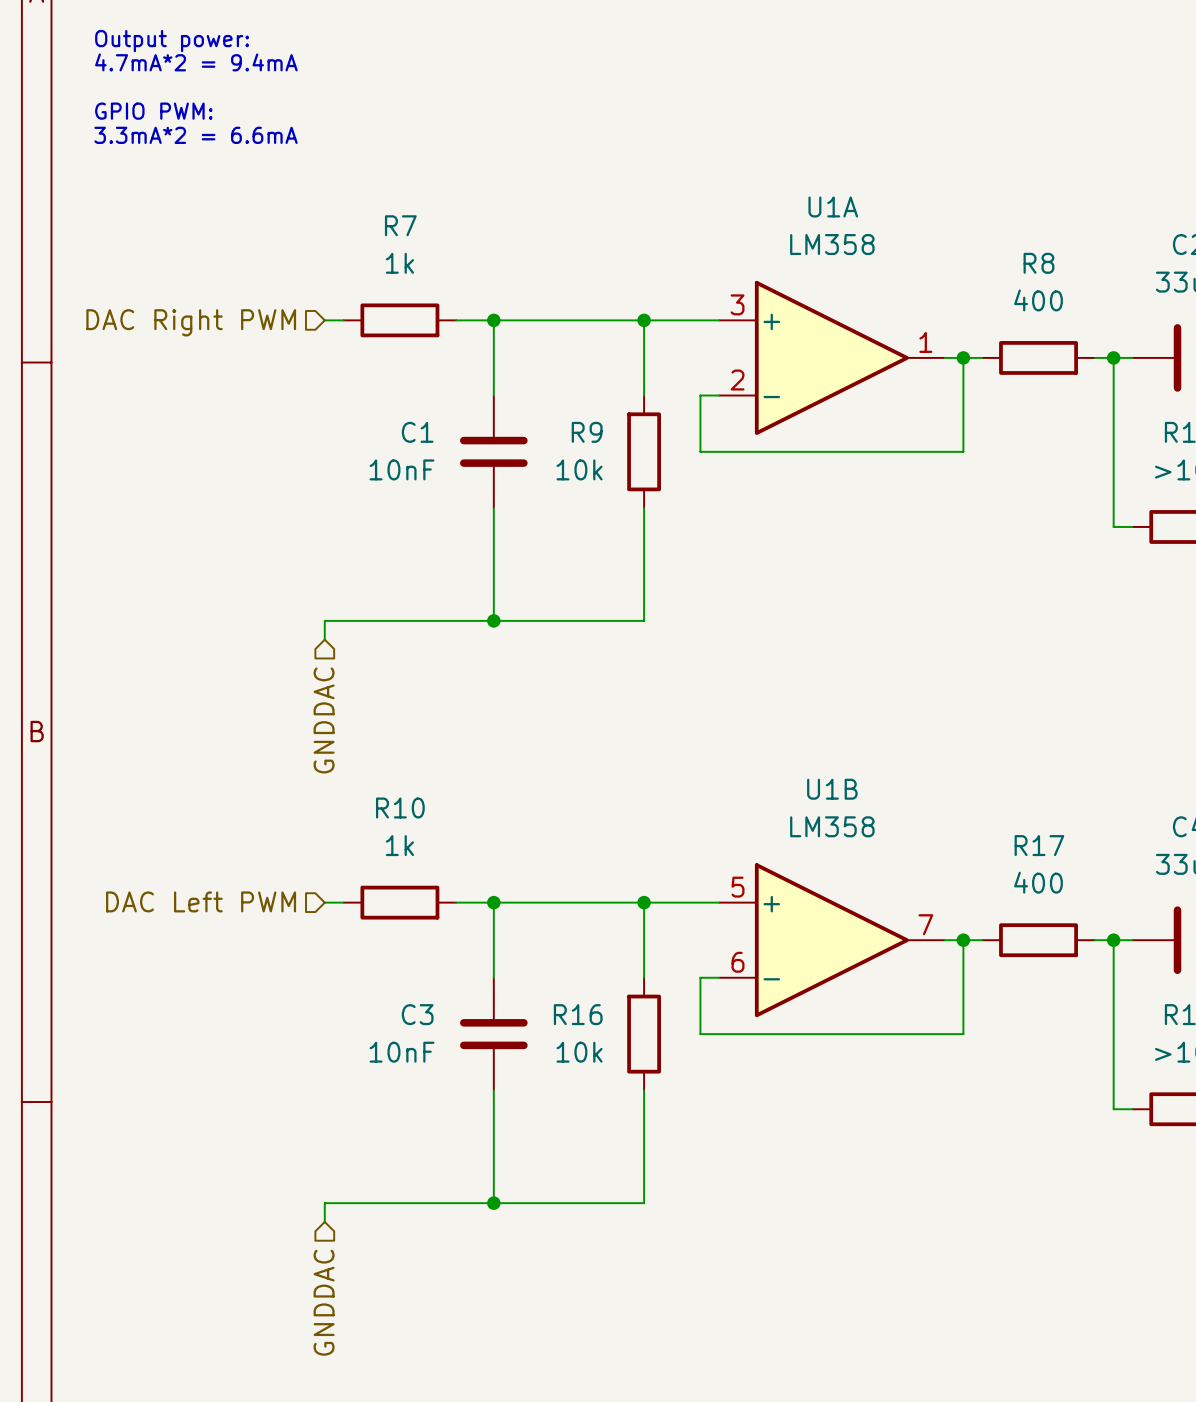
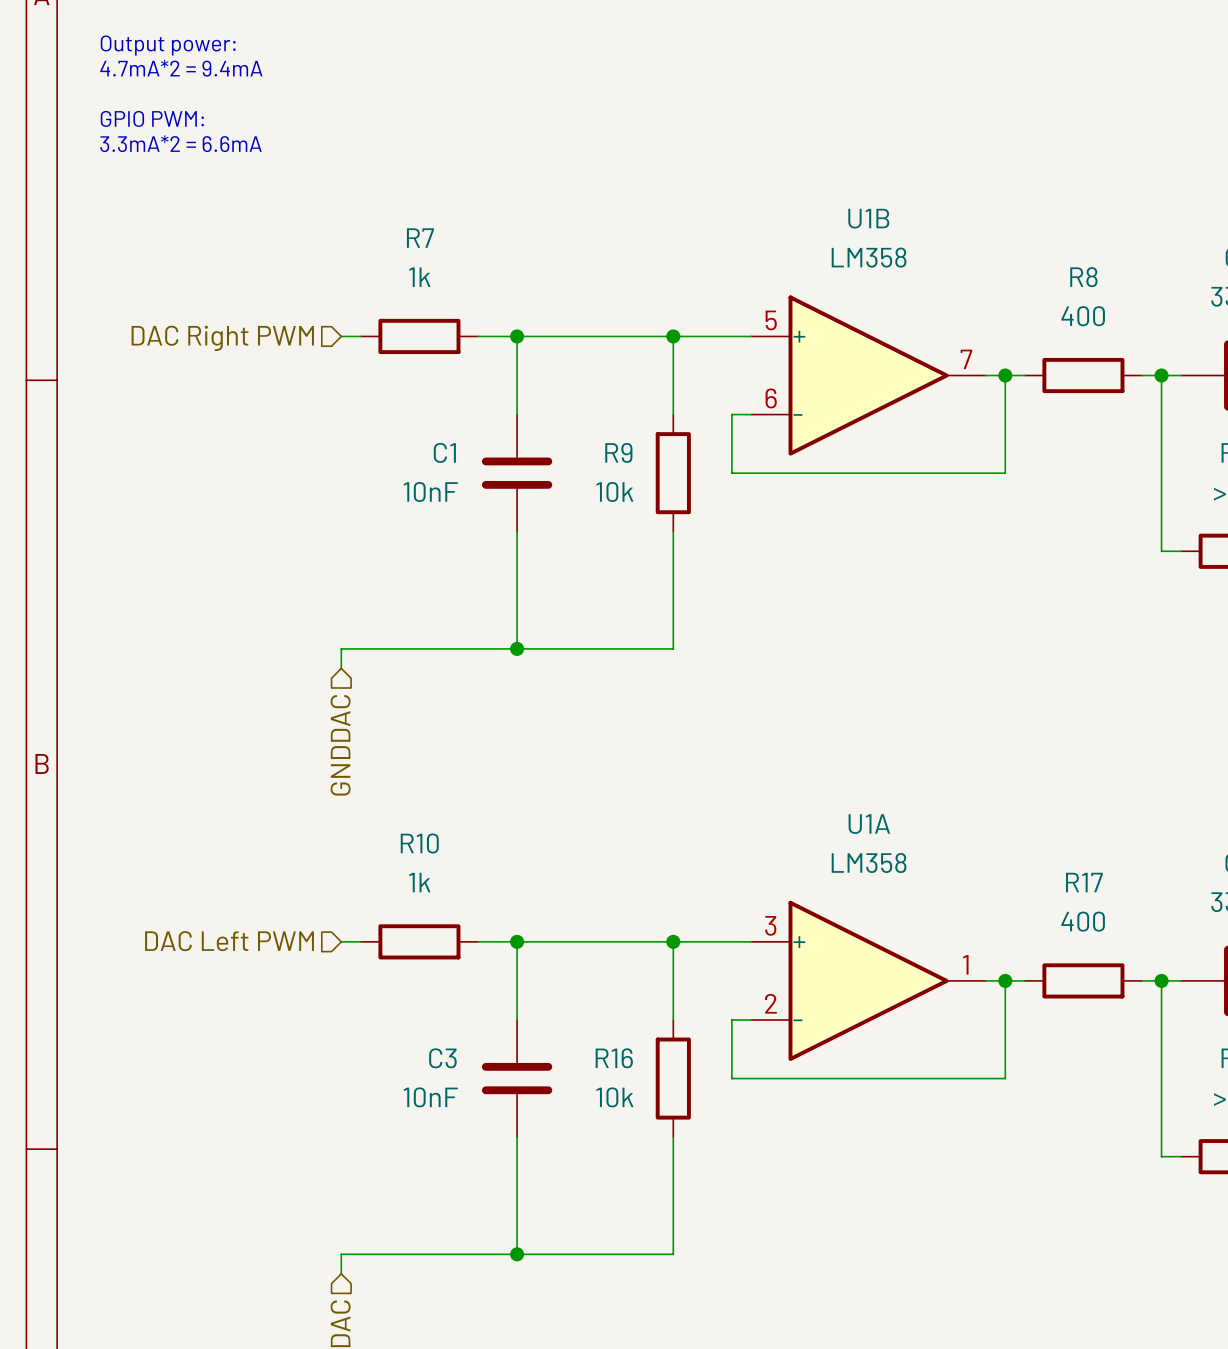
U1A position: (831, 357) -> (868, 980)
U1B position: (831, 940) -> (868, 375)

